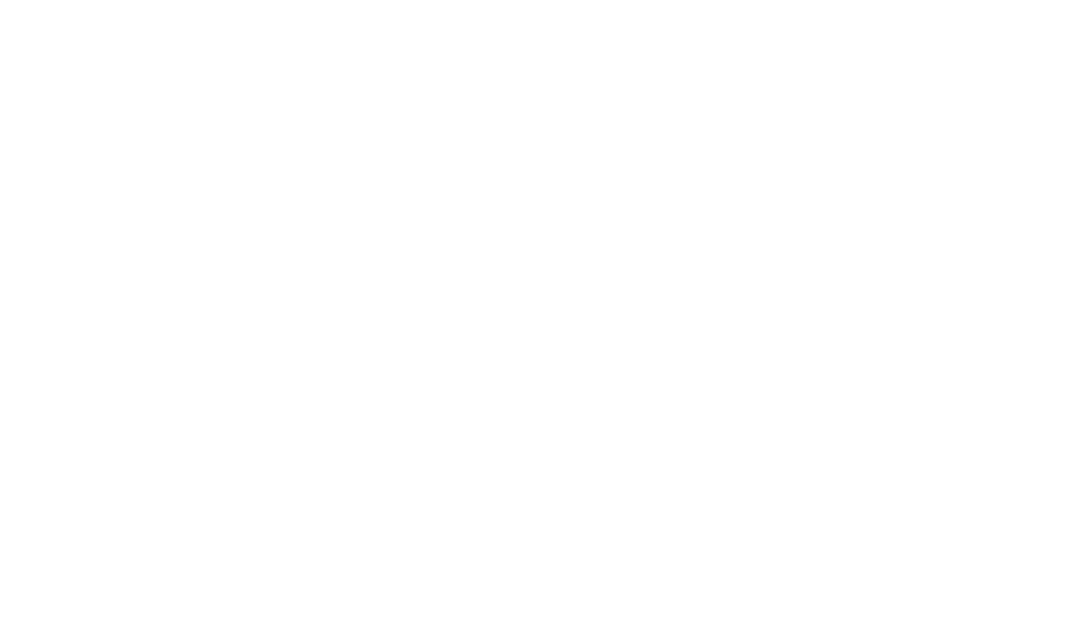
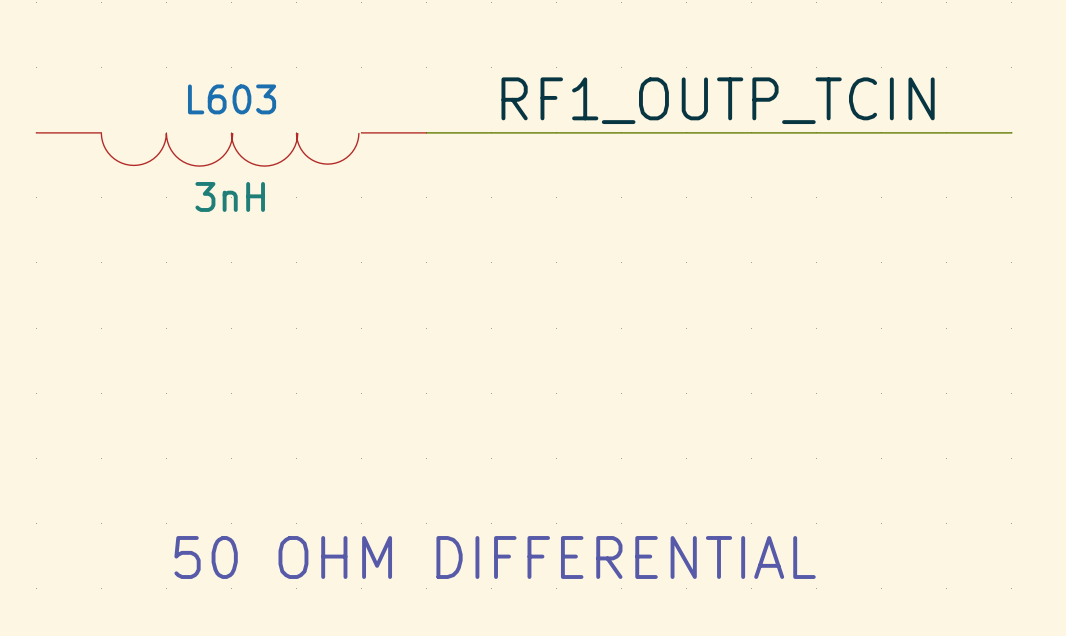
label: none -> RF1_OUTP_TCIN (718, 100)
wire: none -> (426, 132) (1011, 132)
L603: none -> 3nH (231, 149)
text: none -> 50 OHM DIFFERENTIAL (495, 557)

